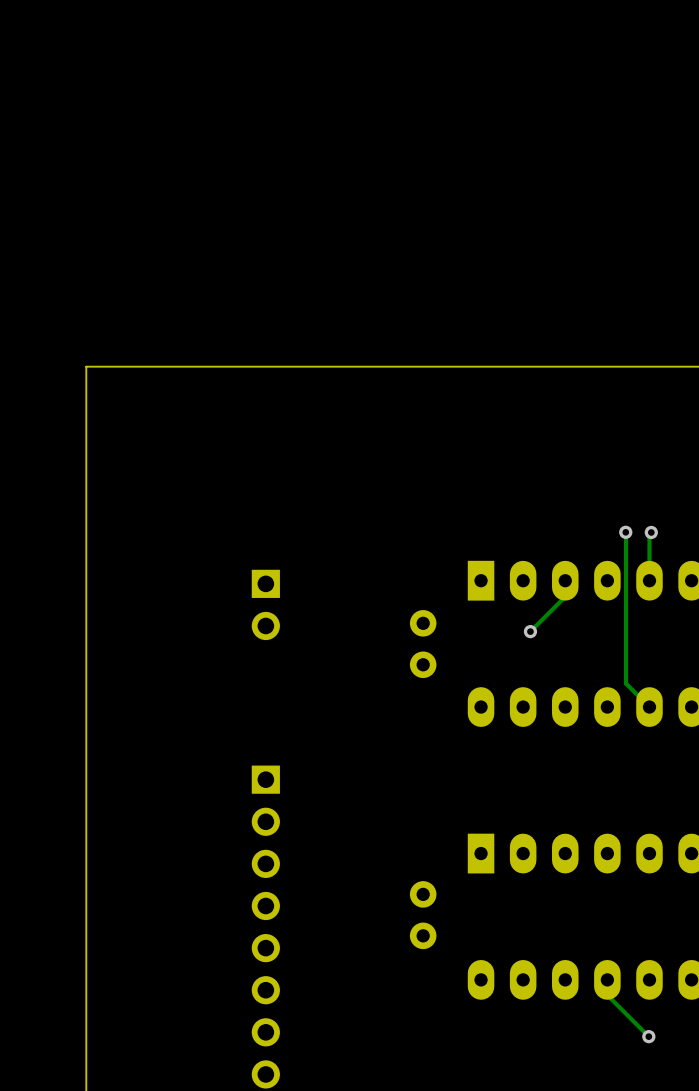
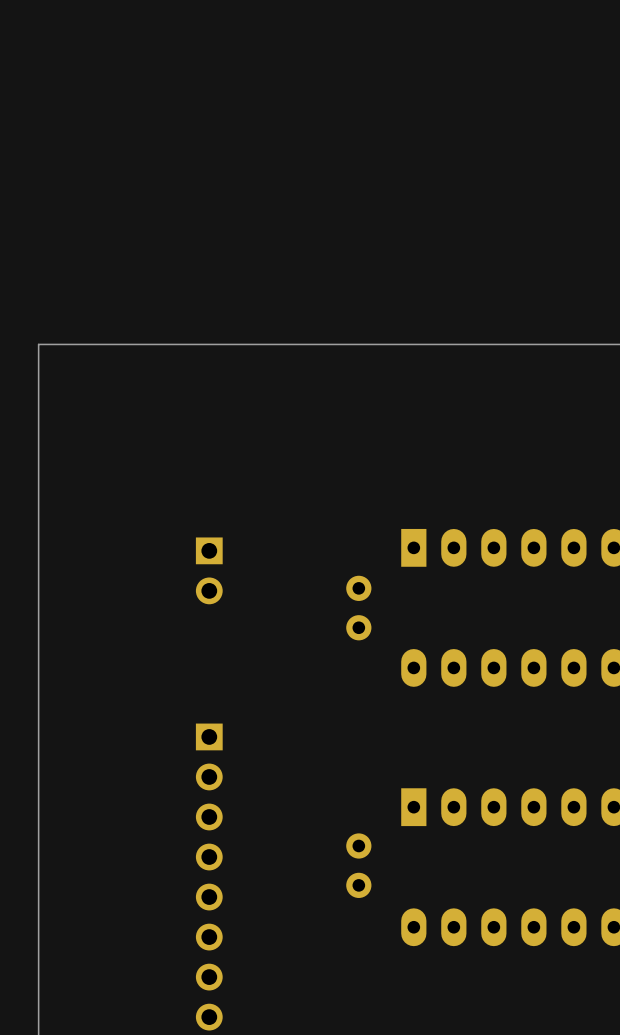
track: (625, 532) (626, 683) (649, 707) -> none
via: (625, 532) -> none
track: (651, 532) (649, 534) (649, 580) -> none
via: (651, 532) -> none
track: (565, 580) (565, 596) (530, 631) -> none
via: (530, 631) -> none
track: (607, 979) (607, 995) (648, 1036) -> none
via: (648, 1036) -> none

